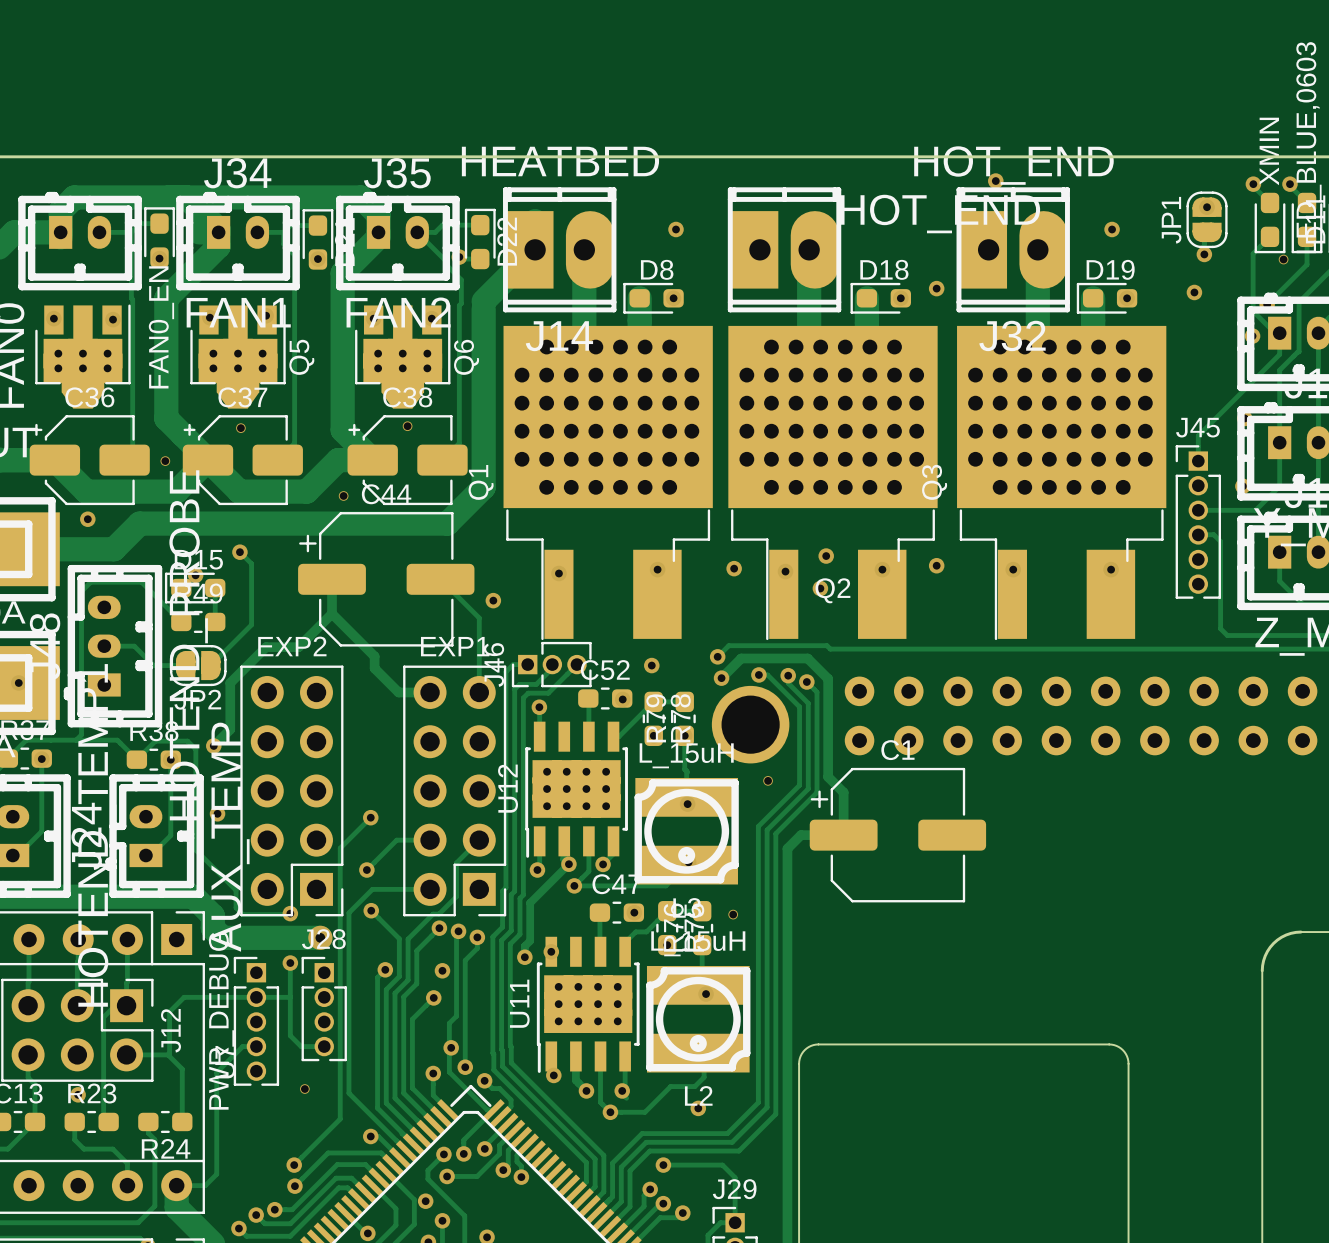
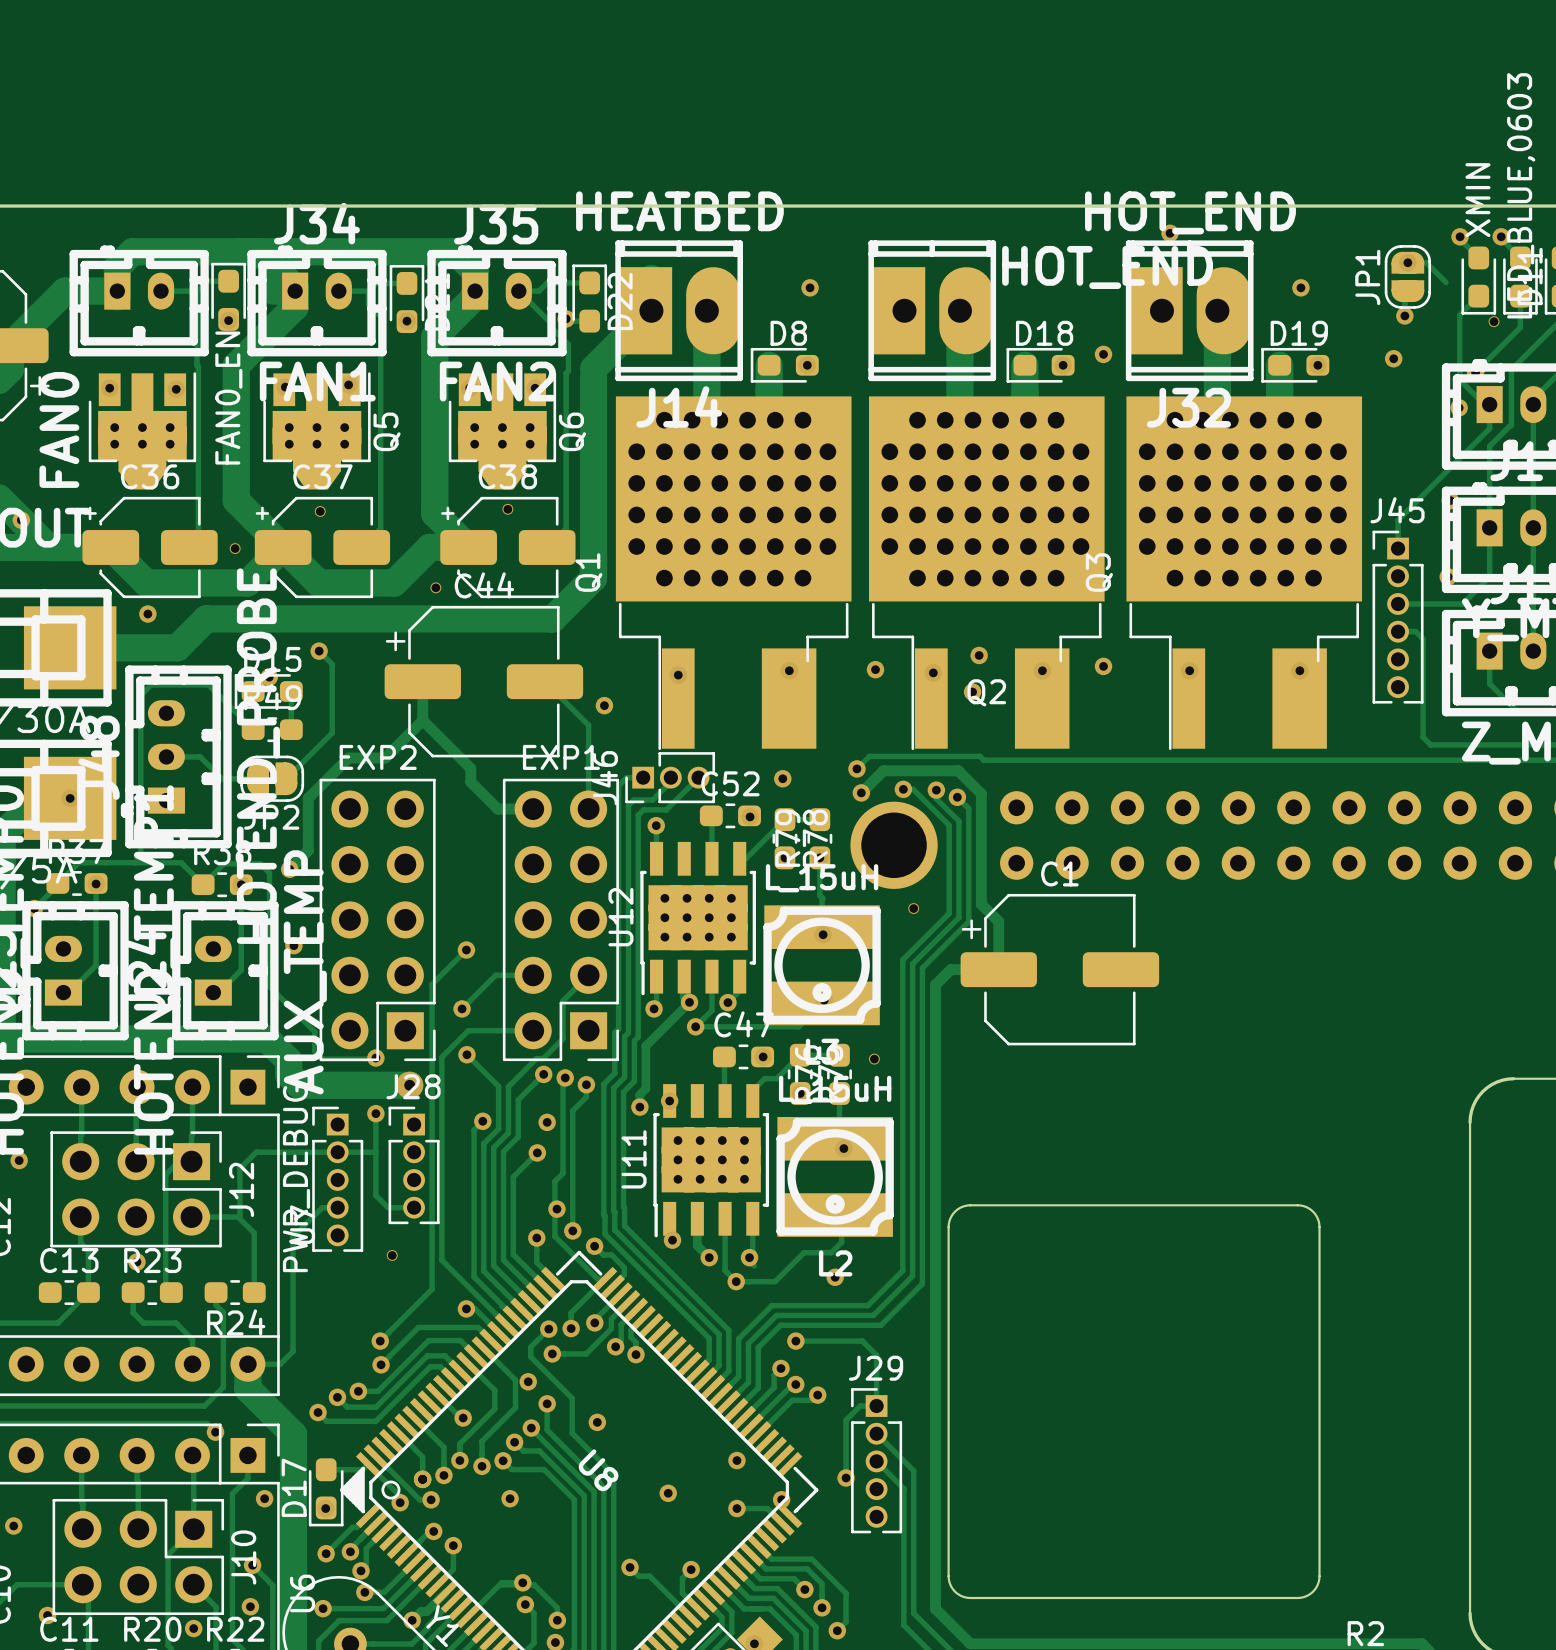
track: none -> (1407, 262) (1426, 262) (1446, 282)

